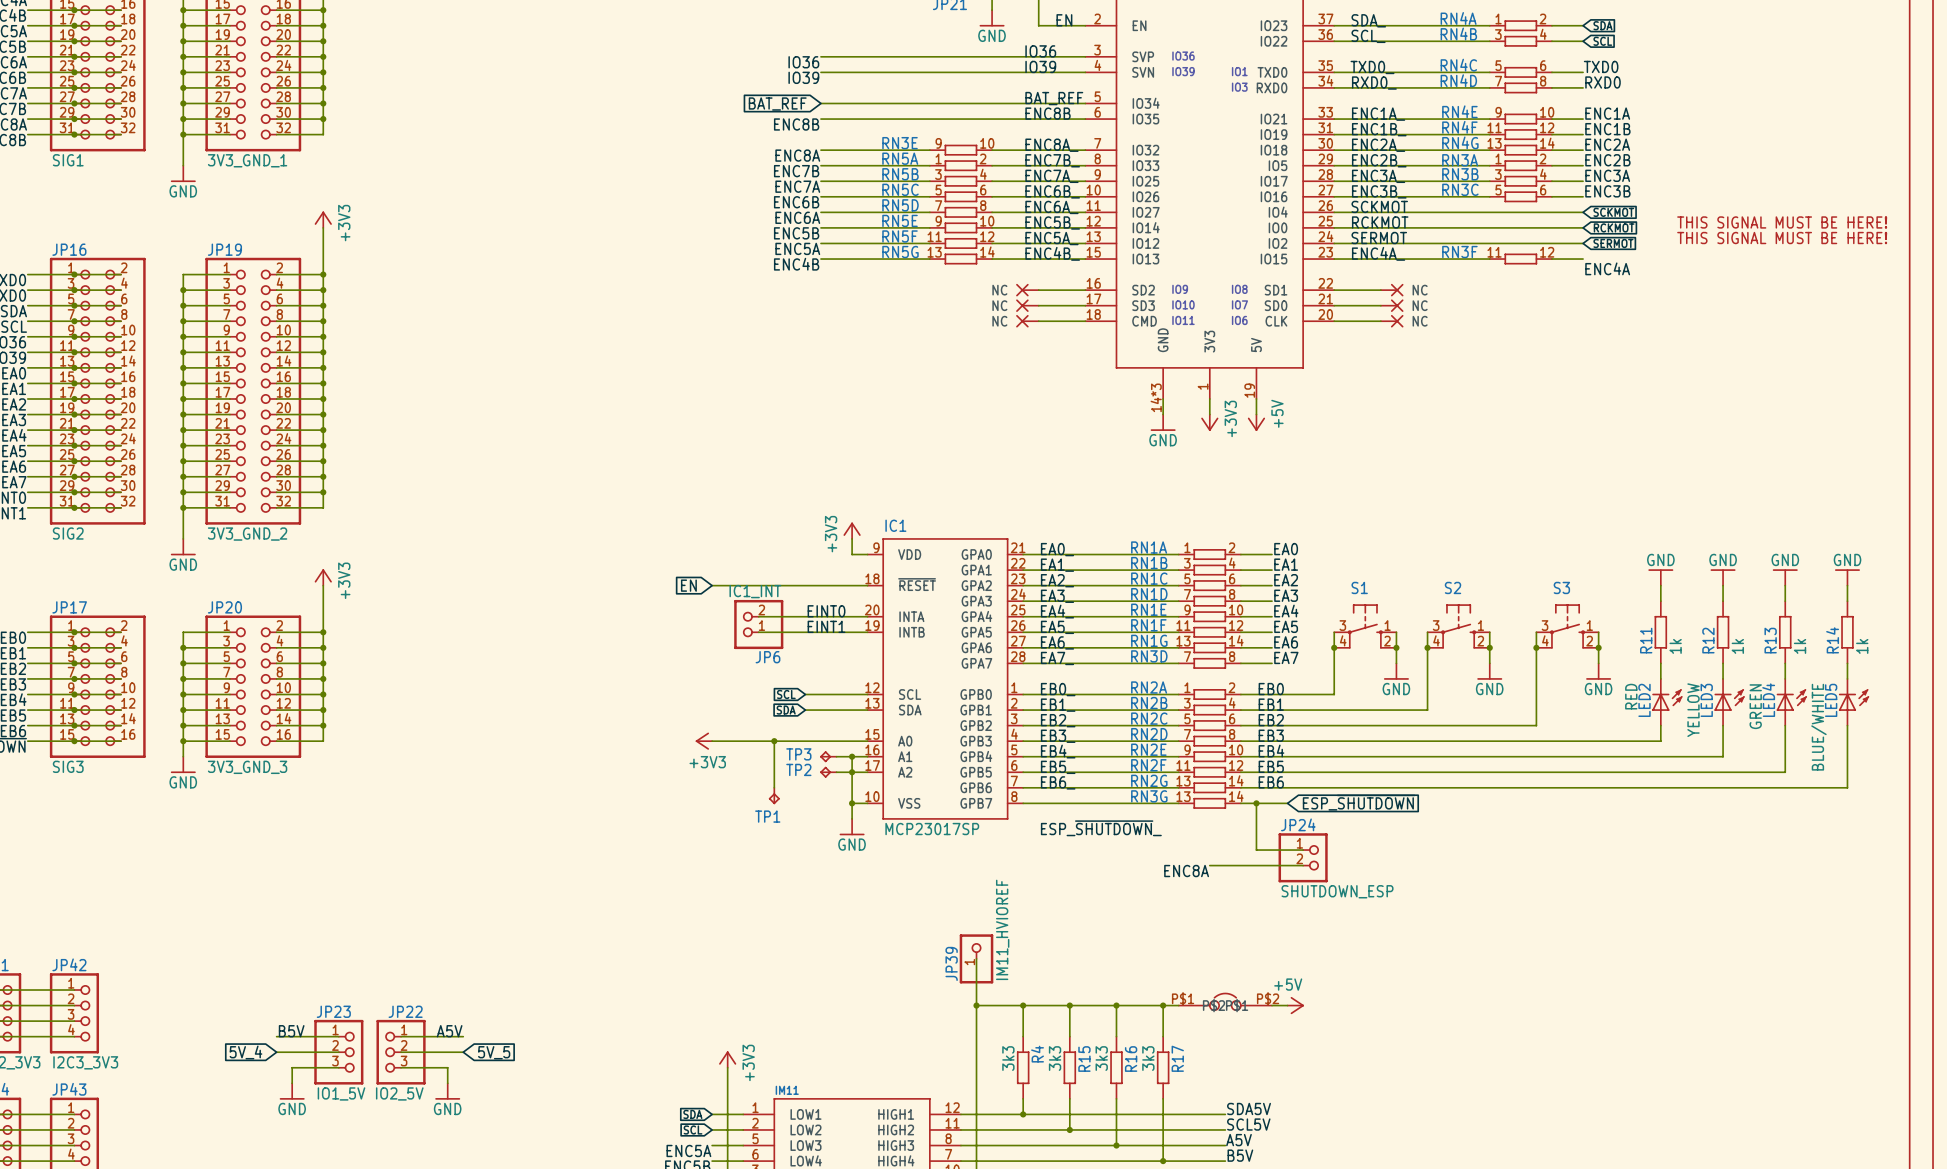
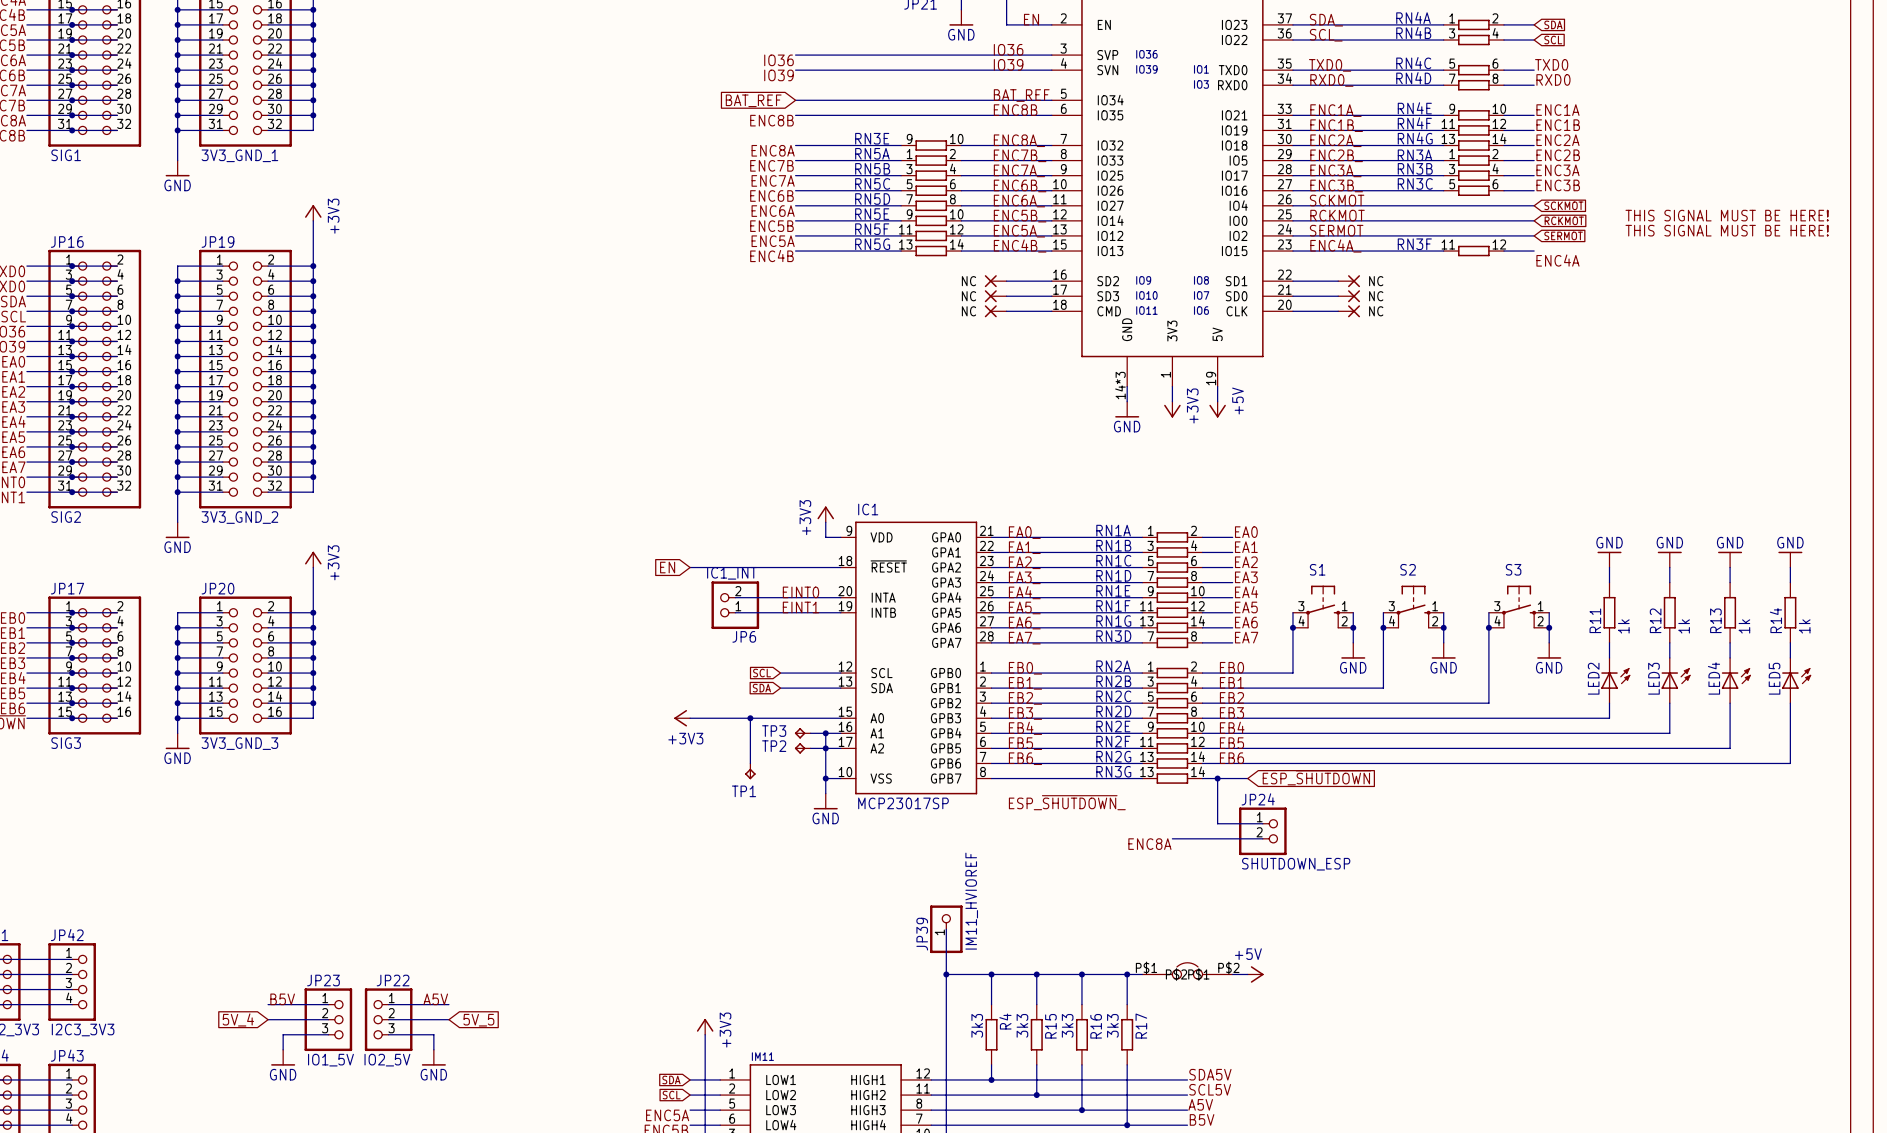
LED2 value: RED (1631, 696) -> none
LED4 value: GREEN (1755, 706) -> none
LED3 value: YELLOW (1693, 710) -> none
LED5 value: BLUE/WHITE (1818, 727) -> none

